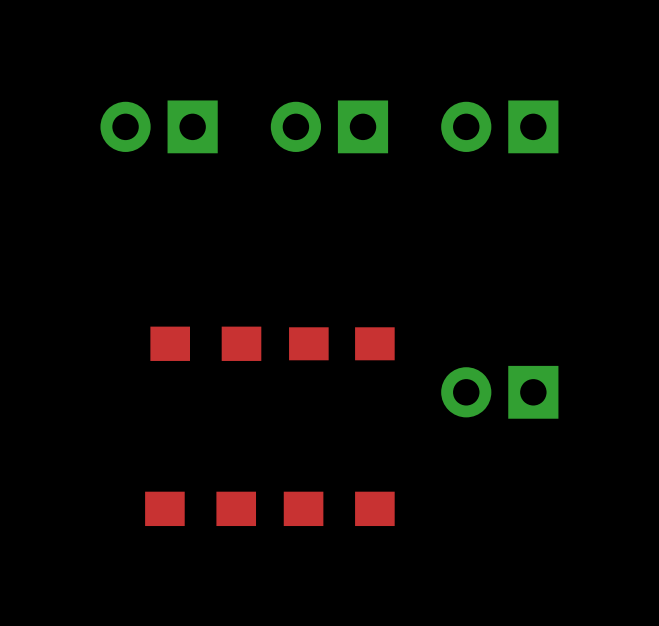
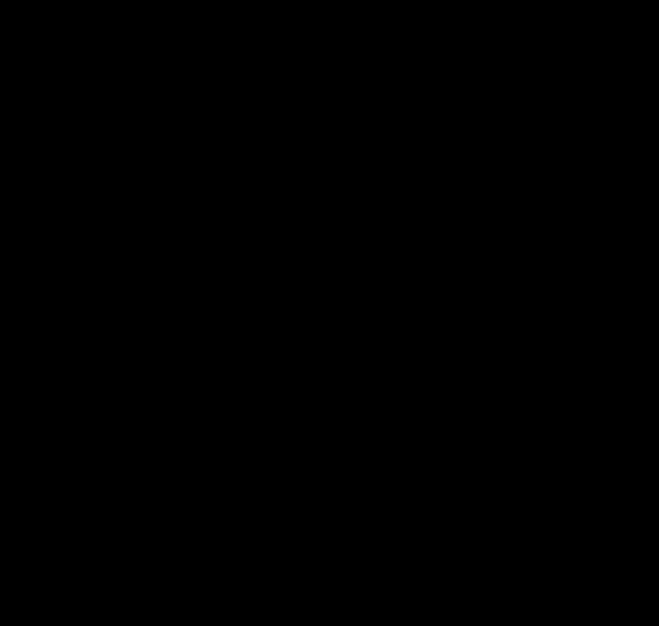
part: (159, 126) -> none
part: (329, 126) -> none
part: (499, 126) -> none
part: (205, 343) -> none
part: (341, 343) -> none
part: (499, 392) -> none
part: (200, 508) -> none
part: (339, 508) -> none

